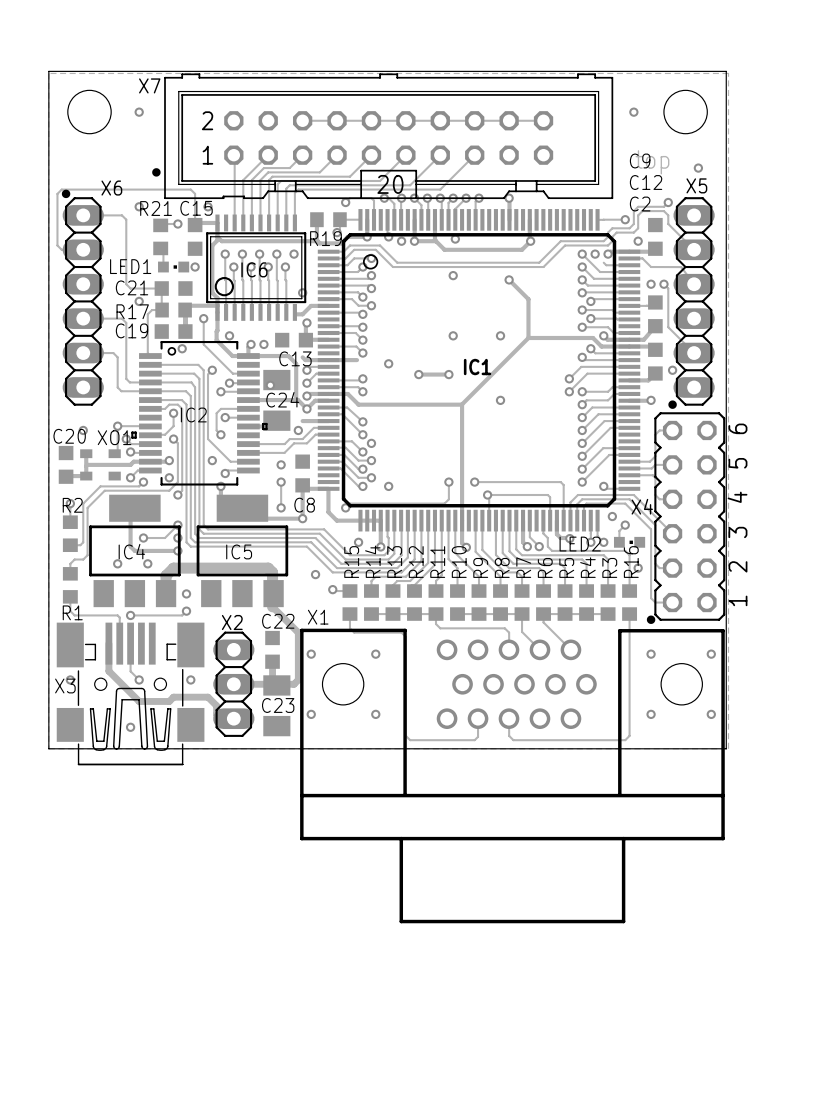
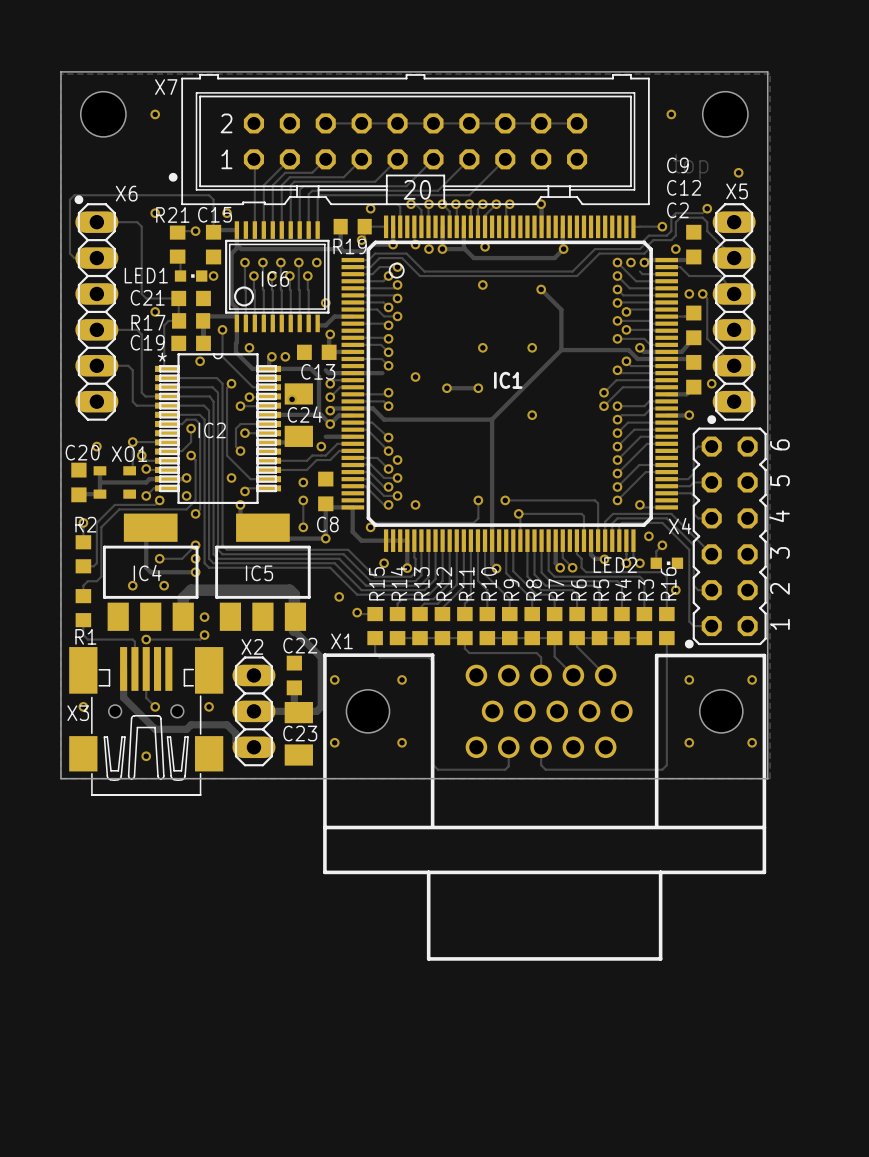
IC2 footprint: [131, 341, 268, 486] -> [155, 353, 282, 505]

